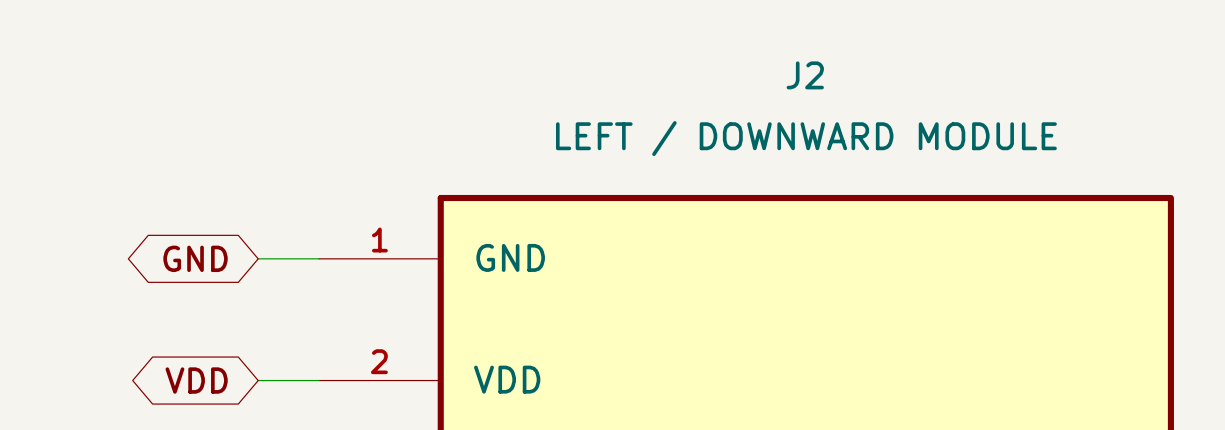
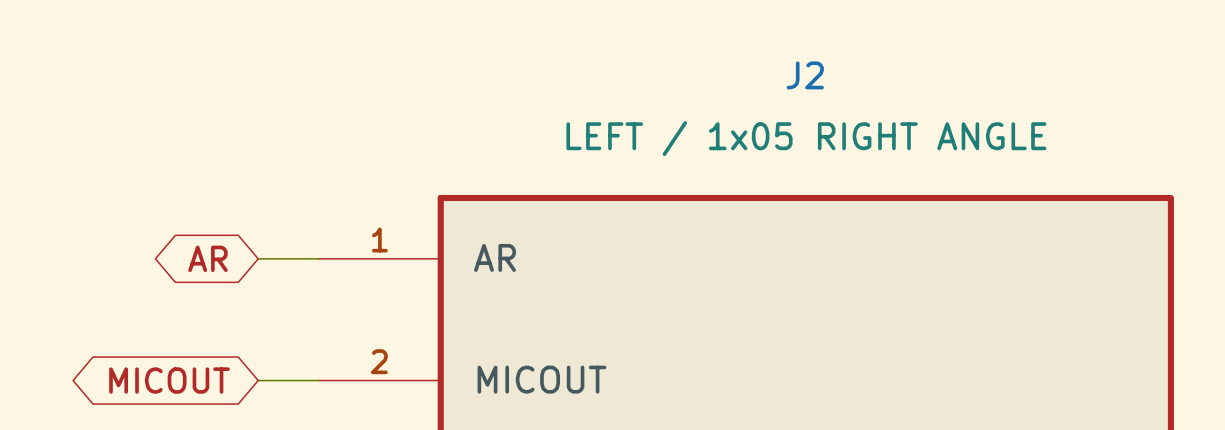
J2 value: LEFT / DOWNWARD MODULE (806, 138) -> LEFT / 1x05 RIGHT ANGLE (806, 138)
J2 pin name: GND (510, 257) -> AR (495, 257)
global label: GND (195, 258) -> AR (207, 258)
J2 pin name: VDD (507, 379) -> MICOUT (541, 379)
global label: VDD (196, 380) -> MICOUT (169, 380)

